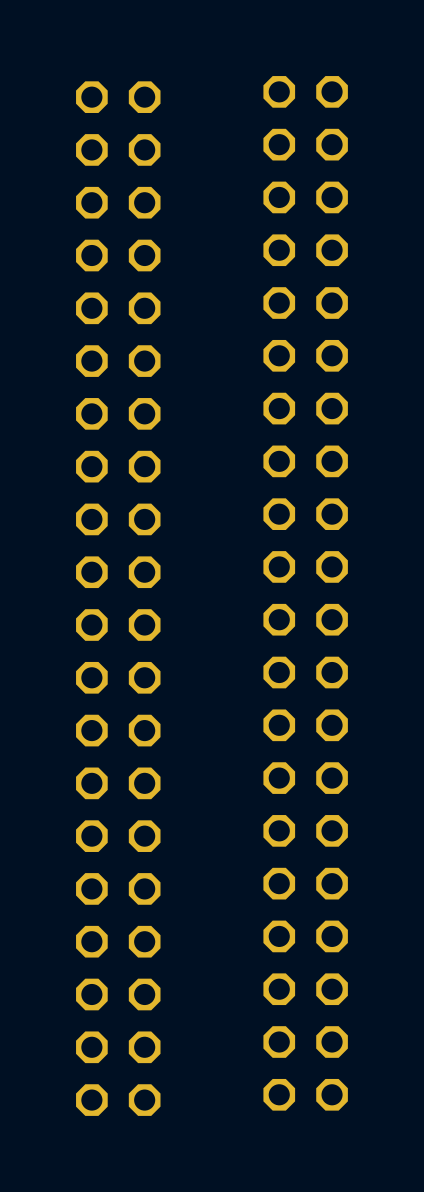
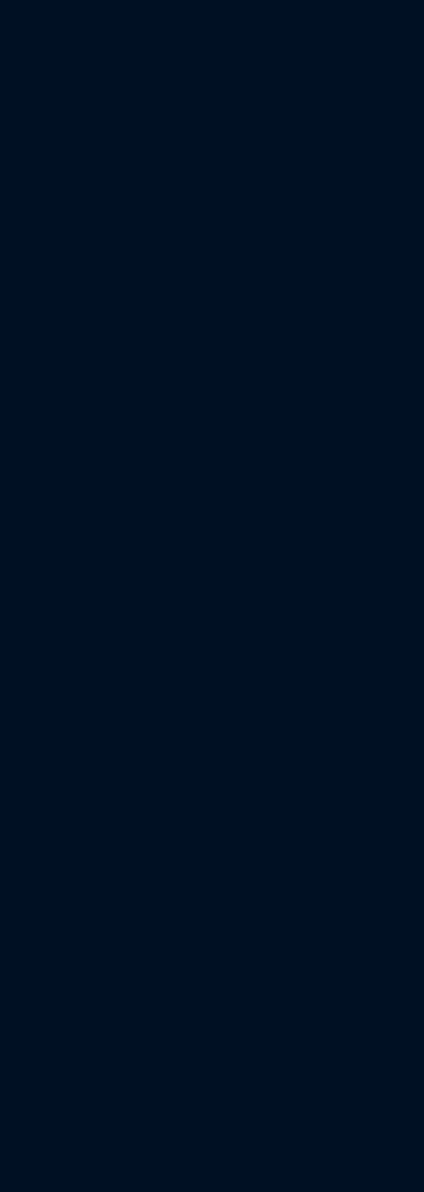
part: (305, 593) -> none
part: (118, 598) -> none

